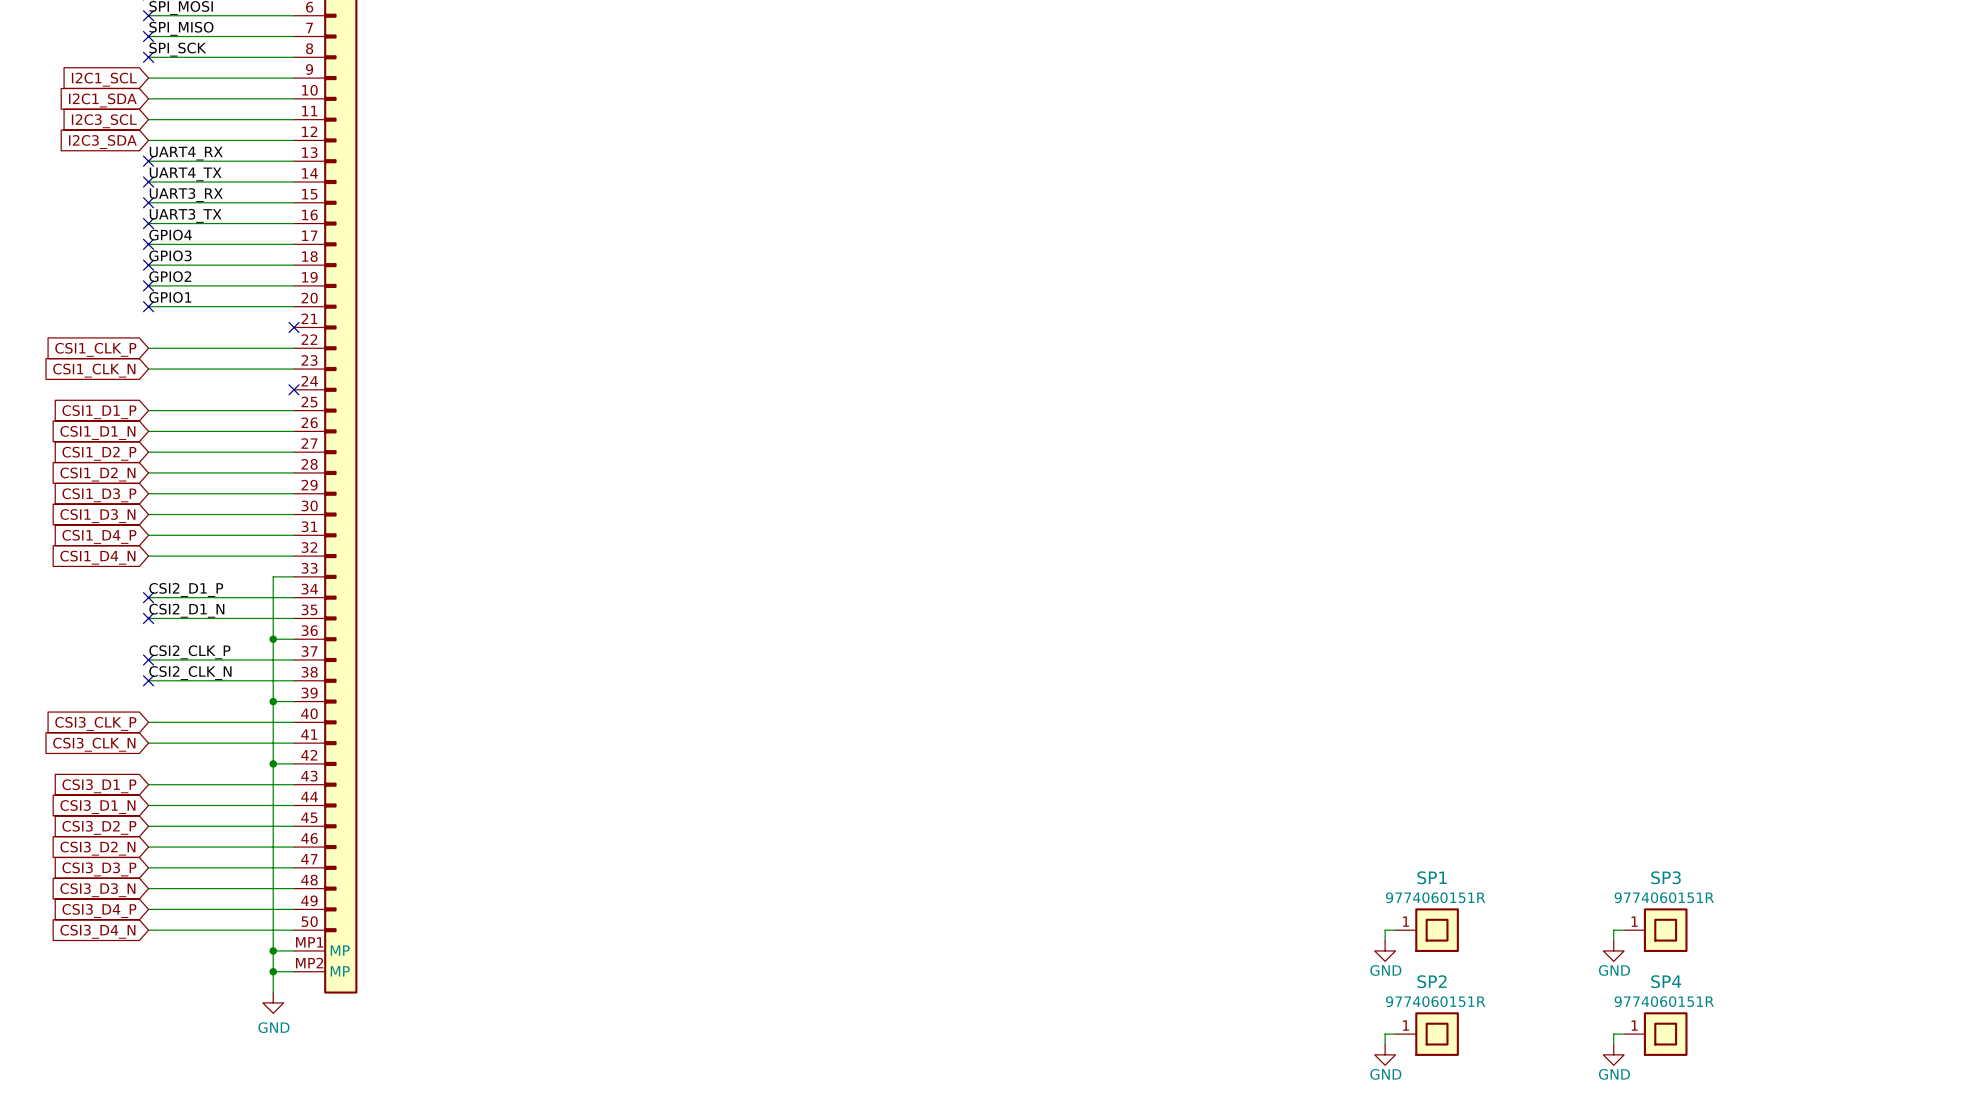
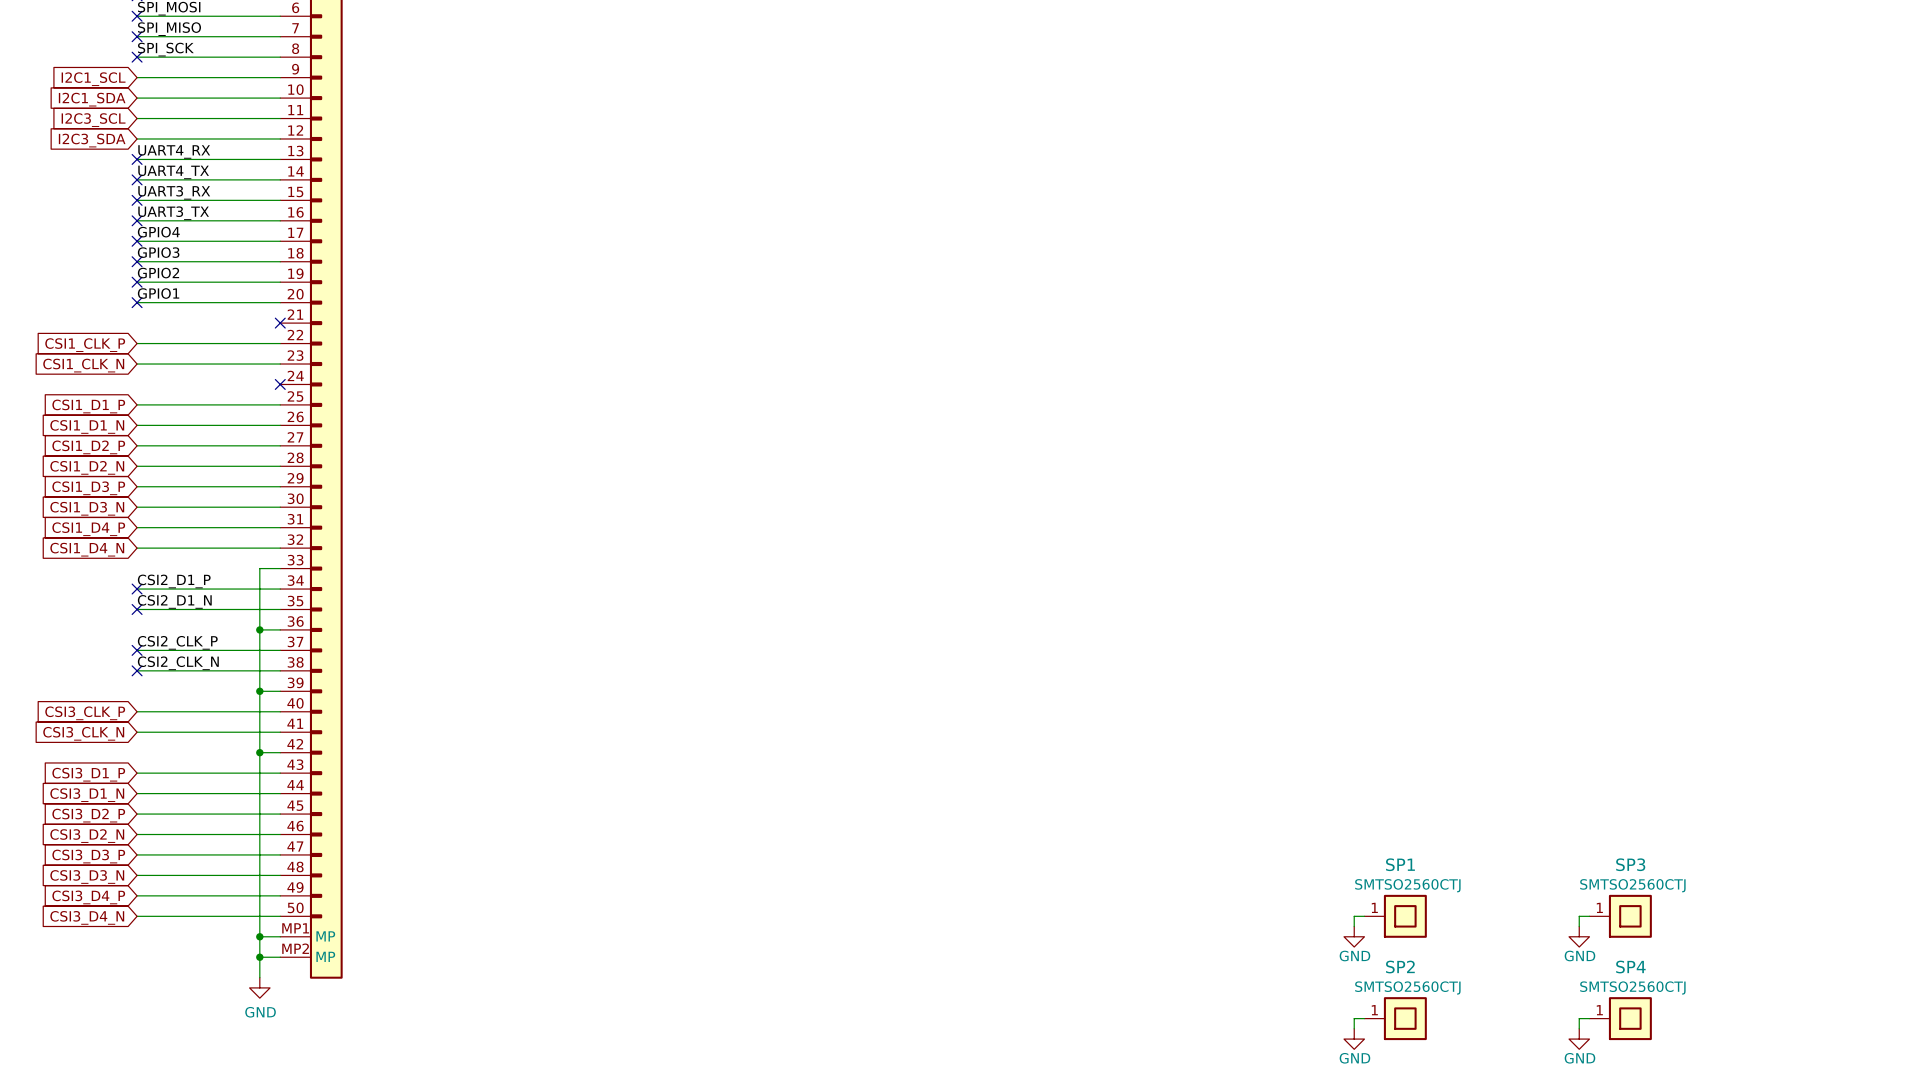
SP1 text: 9774060151R (1435, 897) -> SMTSO2560CTJ (1407, 885)
SP3 text: 9774060151R (1664, 897) -> SMTSO2560CTJ (1632, 885)
SP2 text: 9774060151R (1435, 1001) -> SMTSO2560CTJ (1407, 987)
SP4 text: 9774060151R (1664, 1001) -> SMTSO2560CTJ (1632, 987)

